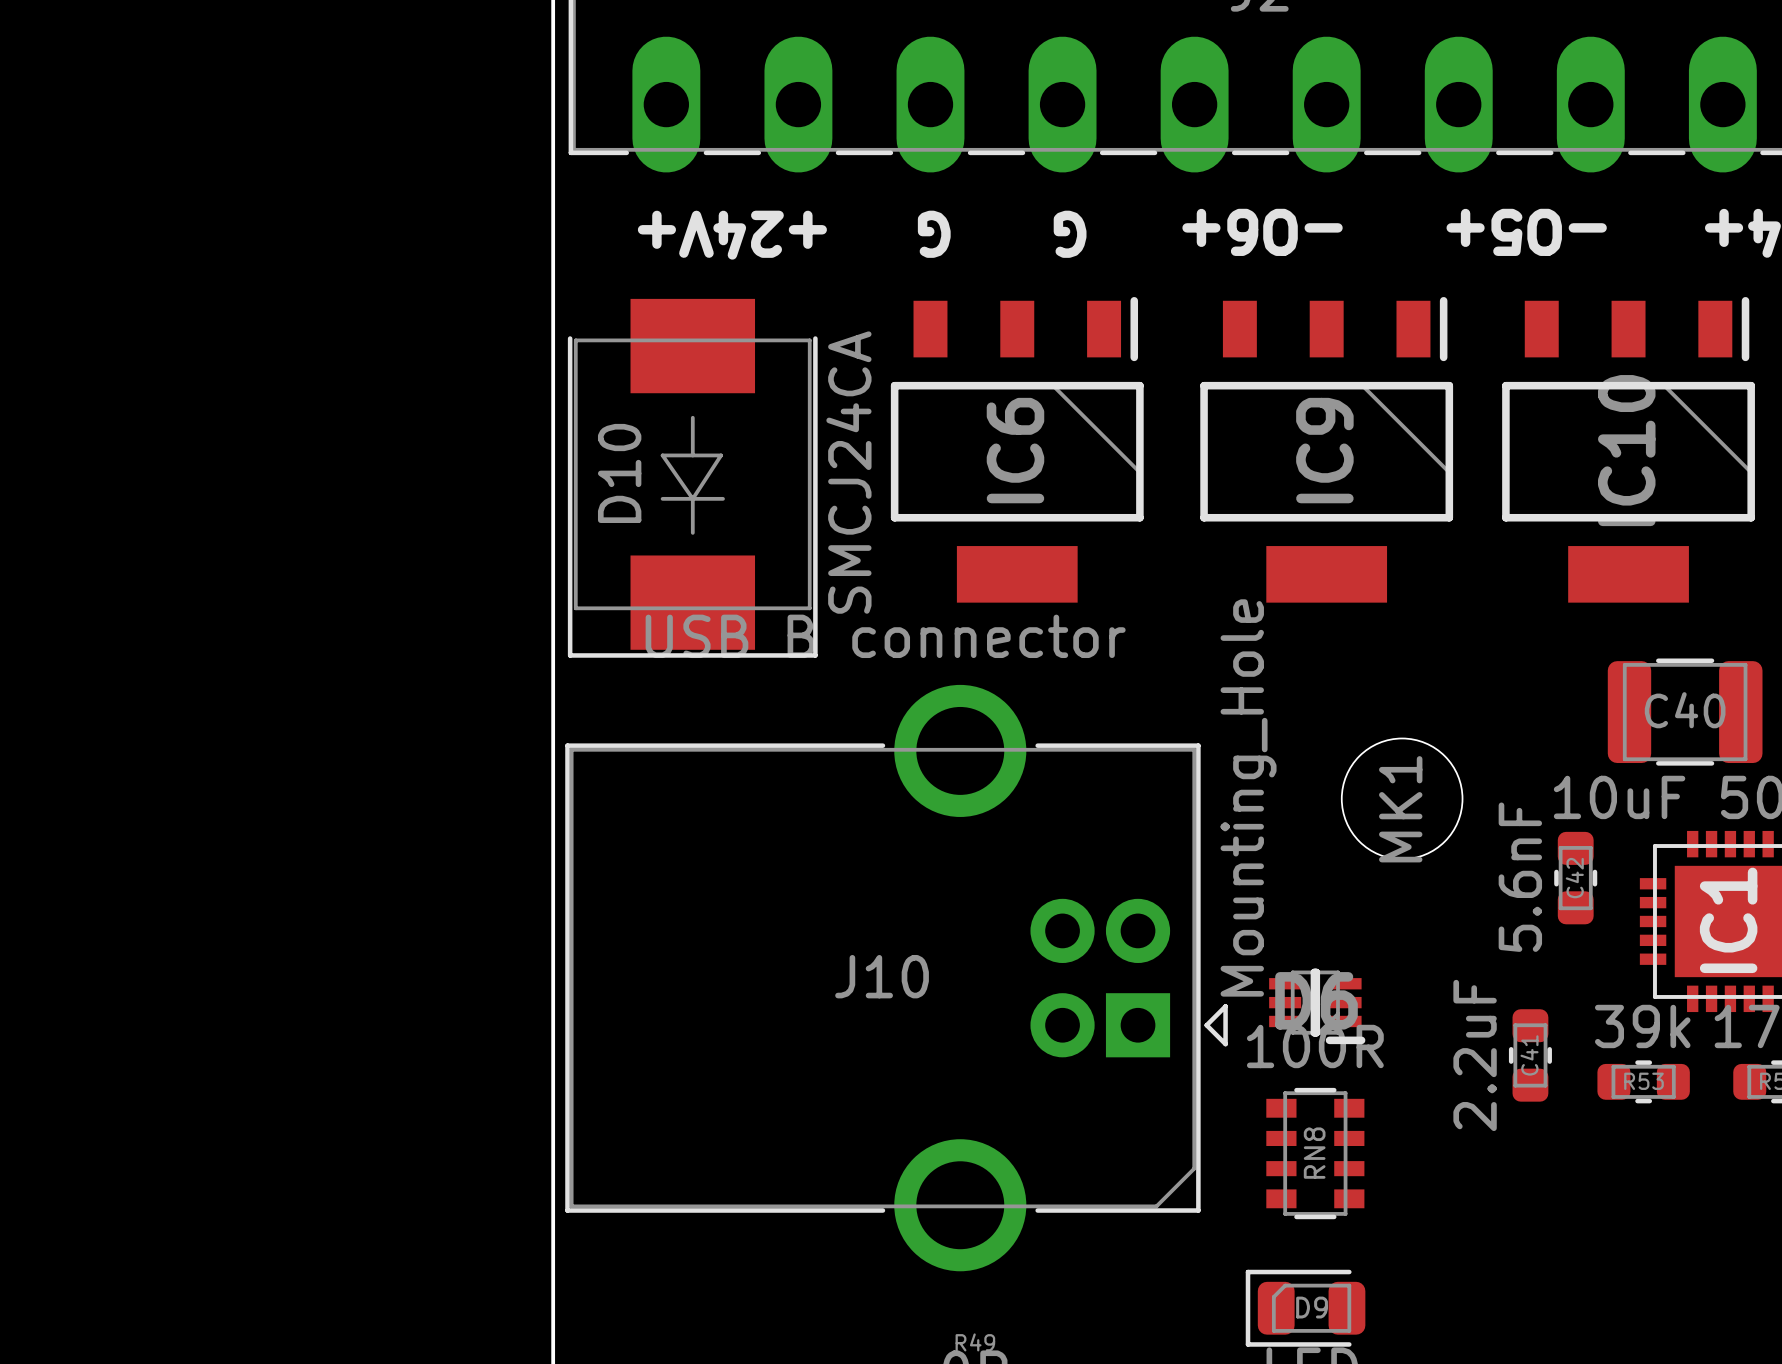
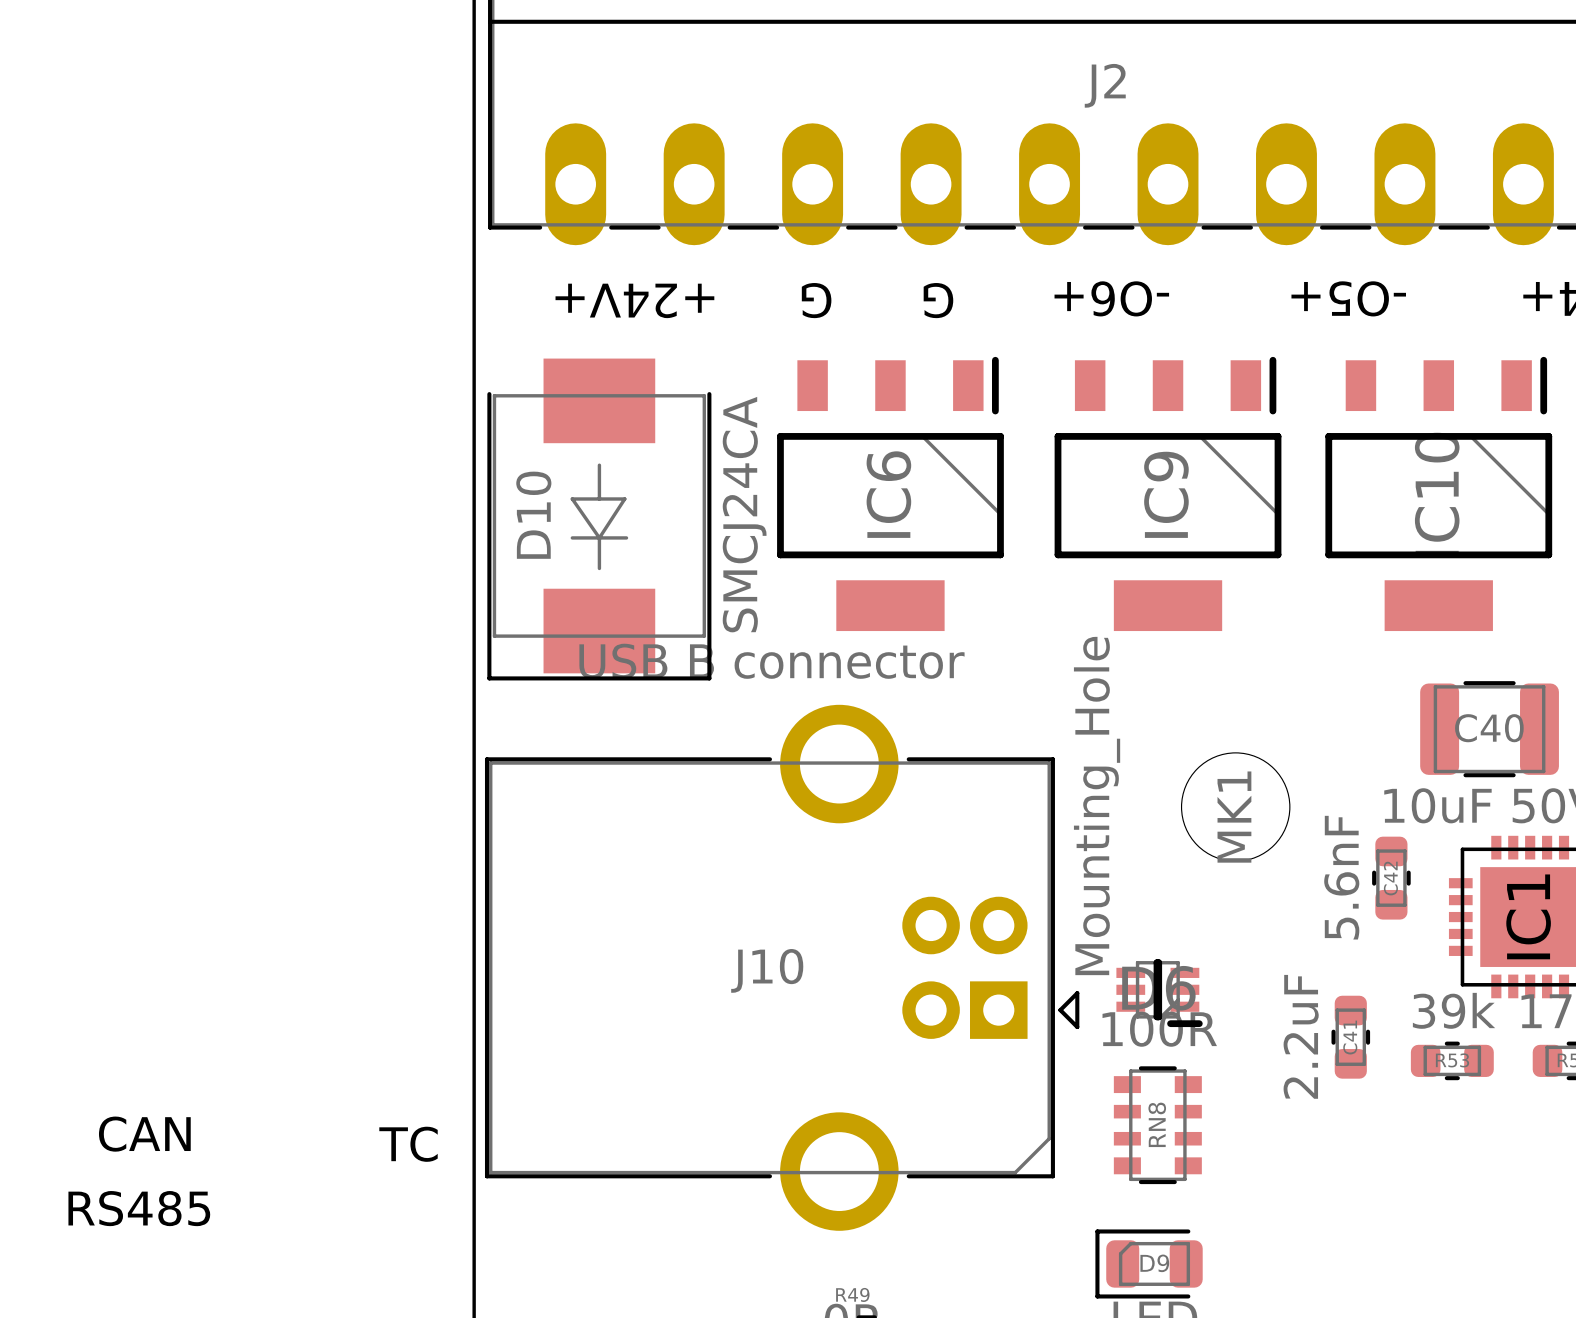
text: none -> CAN (144, 1134)
text: none -> TC (408, 1144)
text: none -> RS485 (139, 1208)

